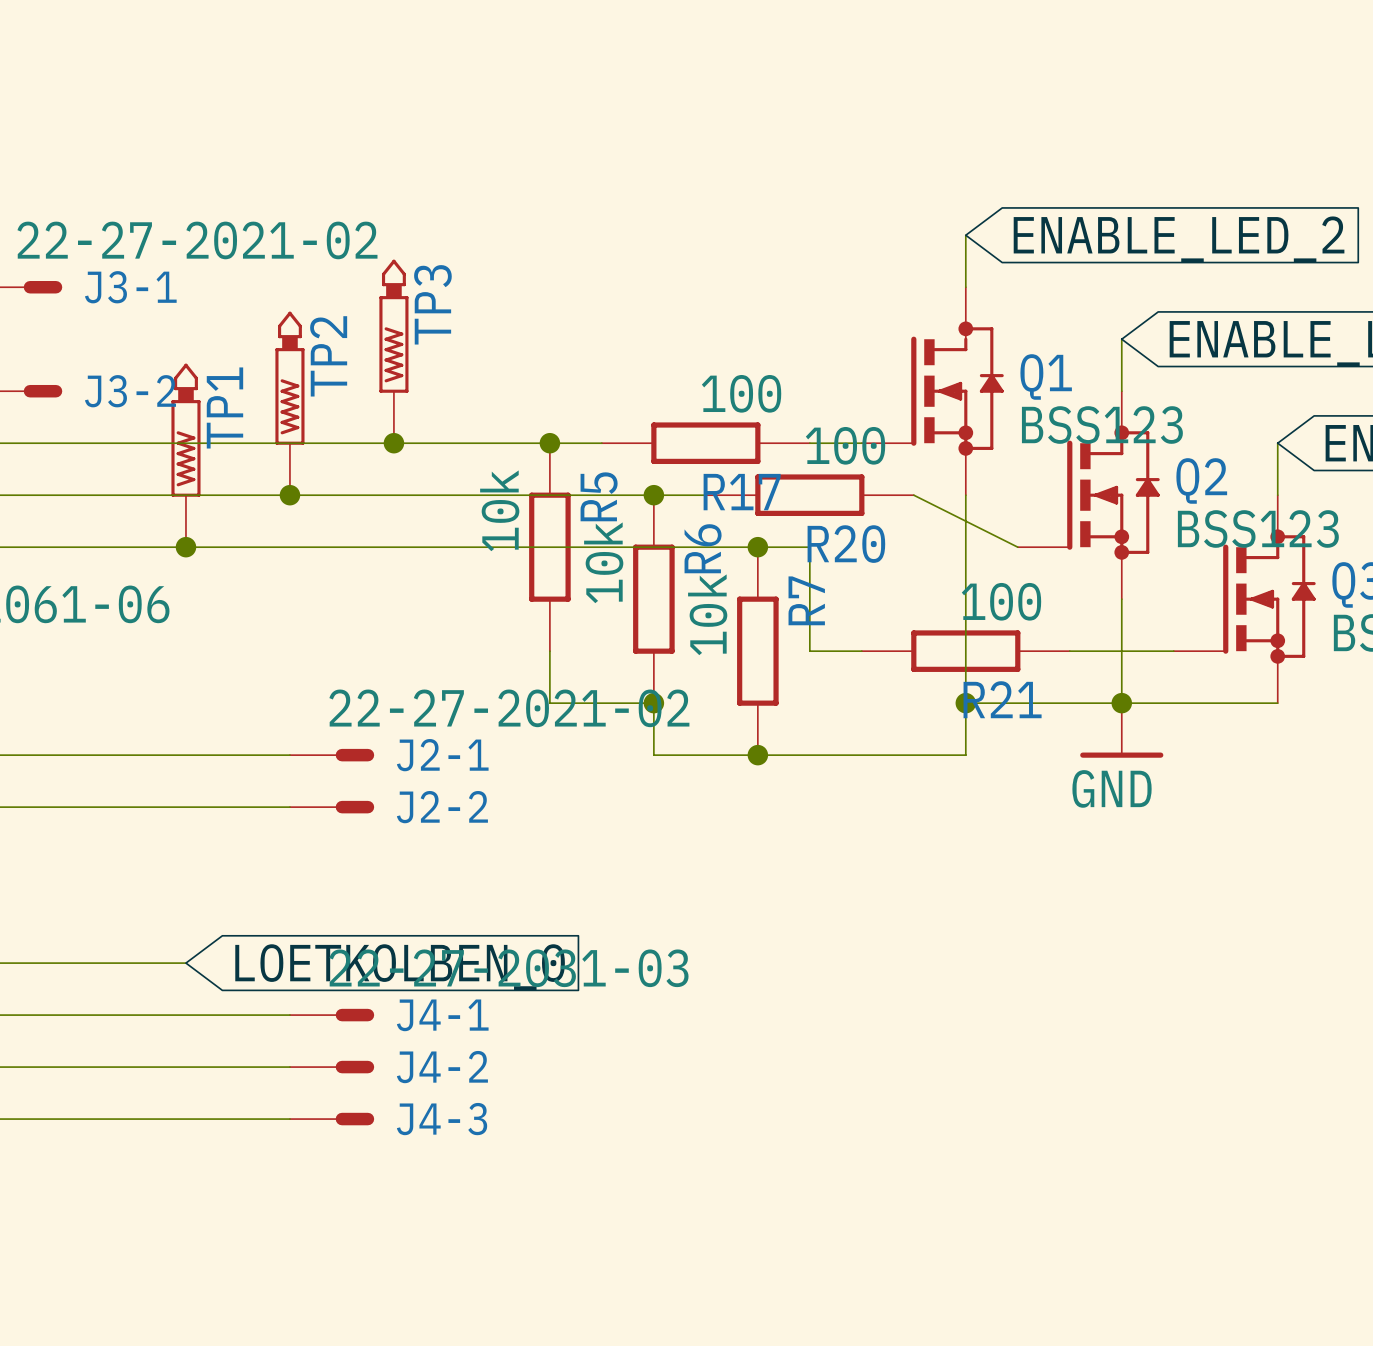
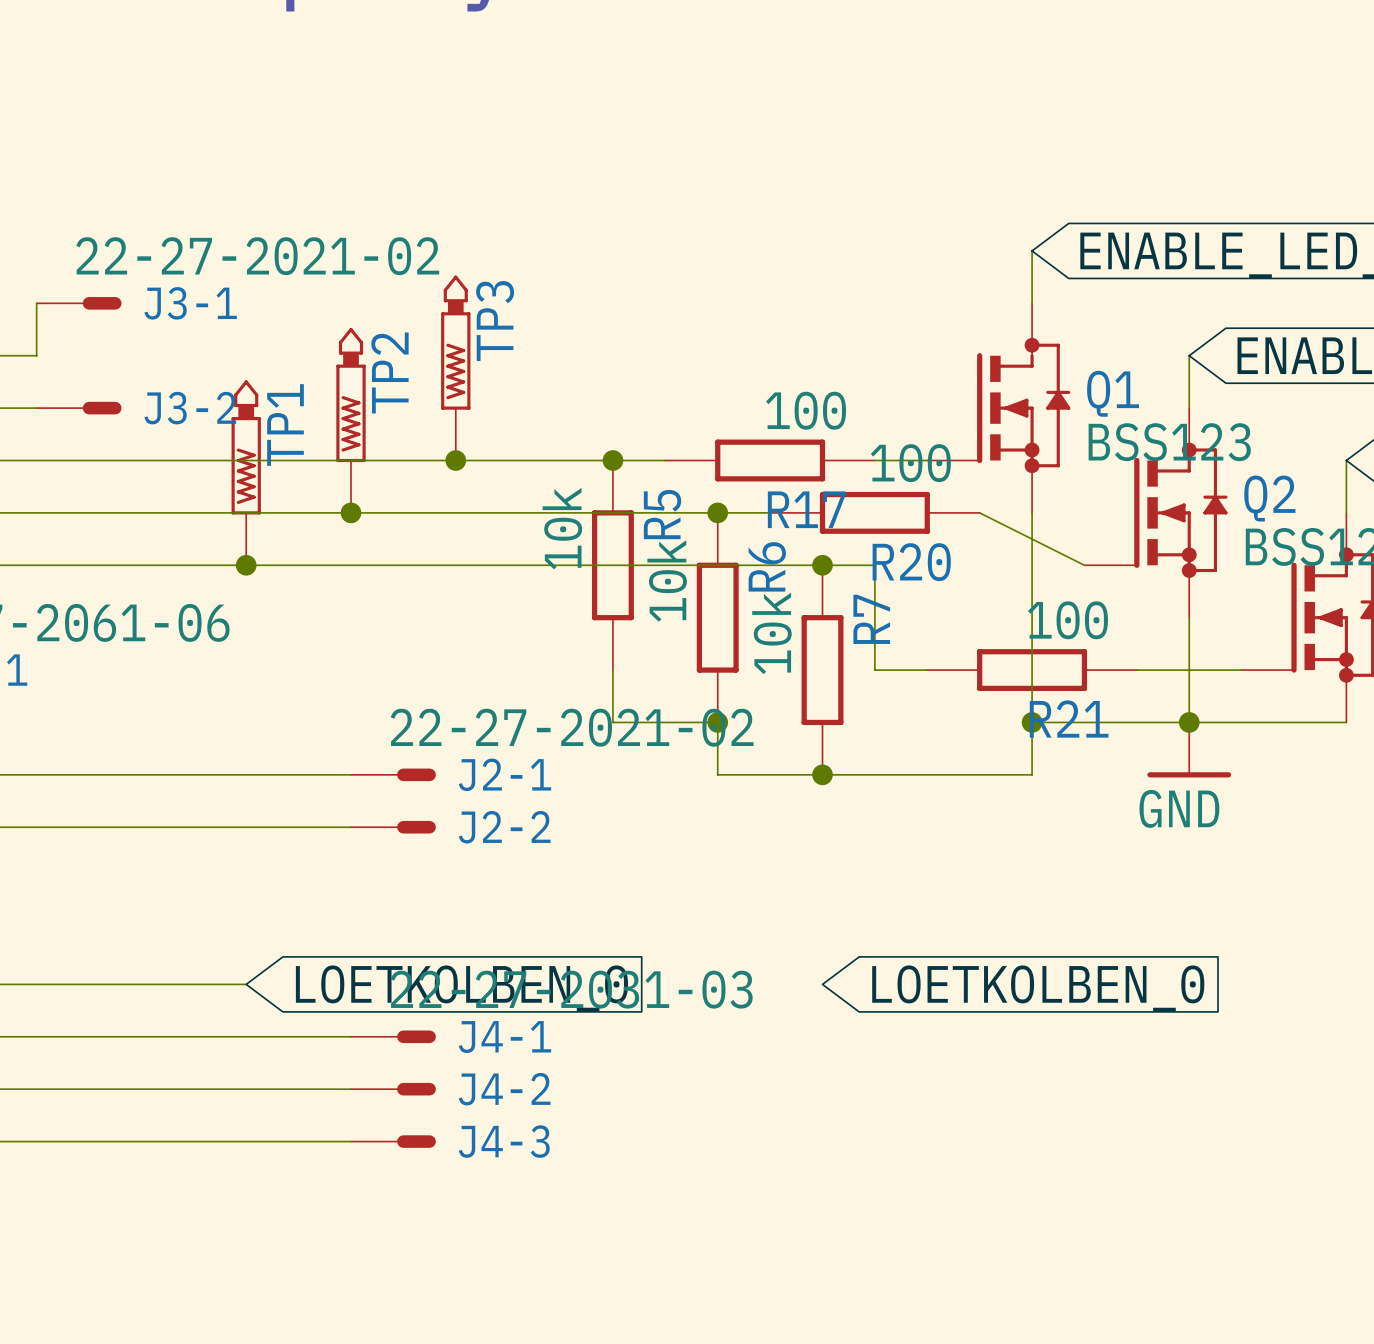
global label: none -> LOETKOLBEN_0 (1038, 988)

